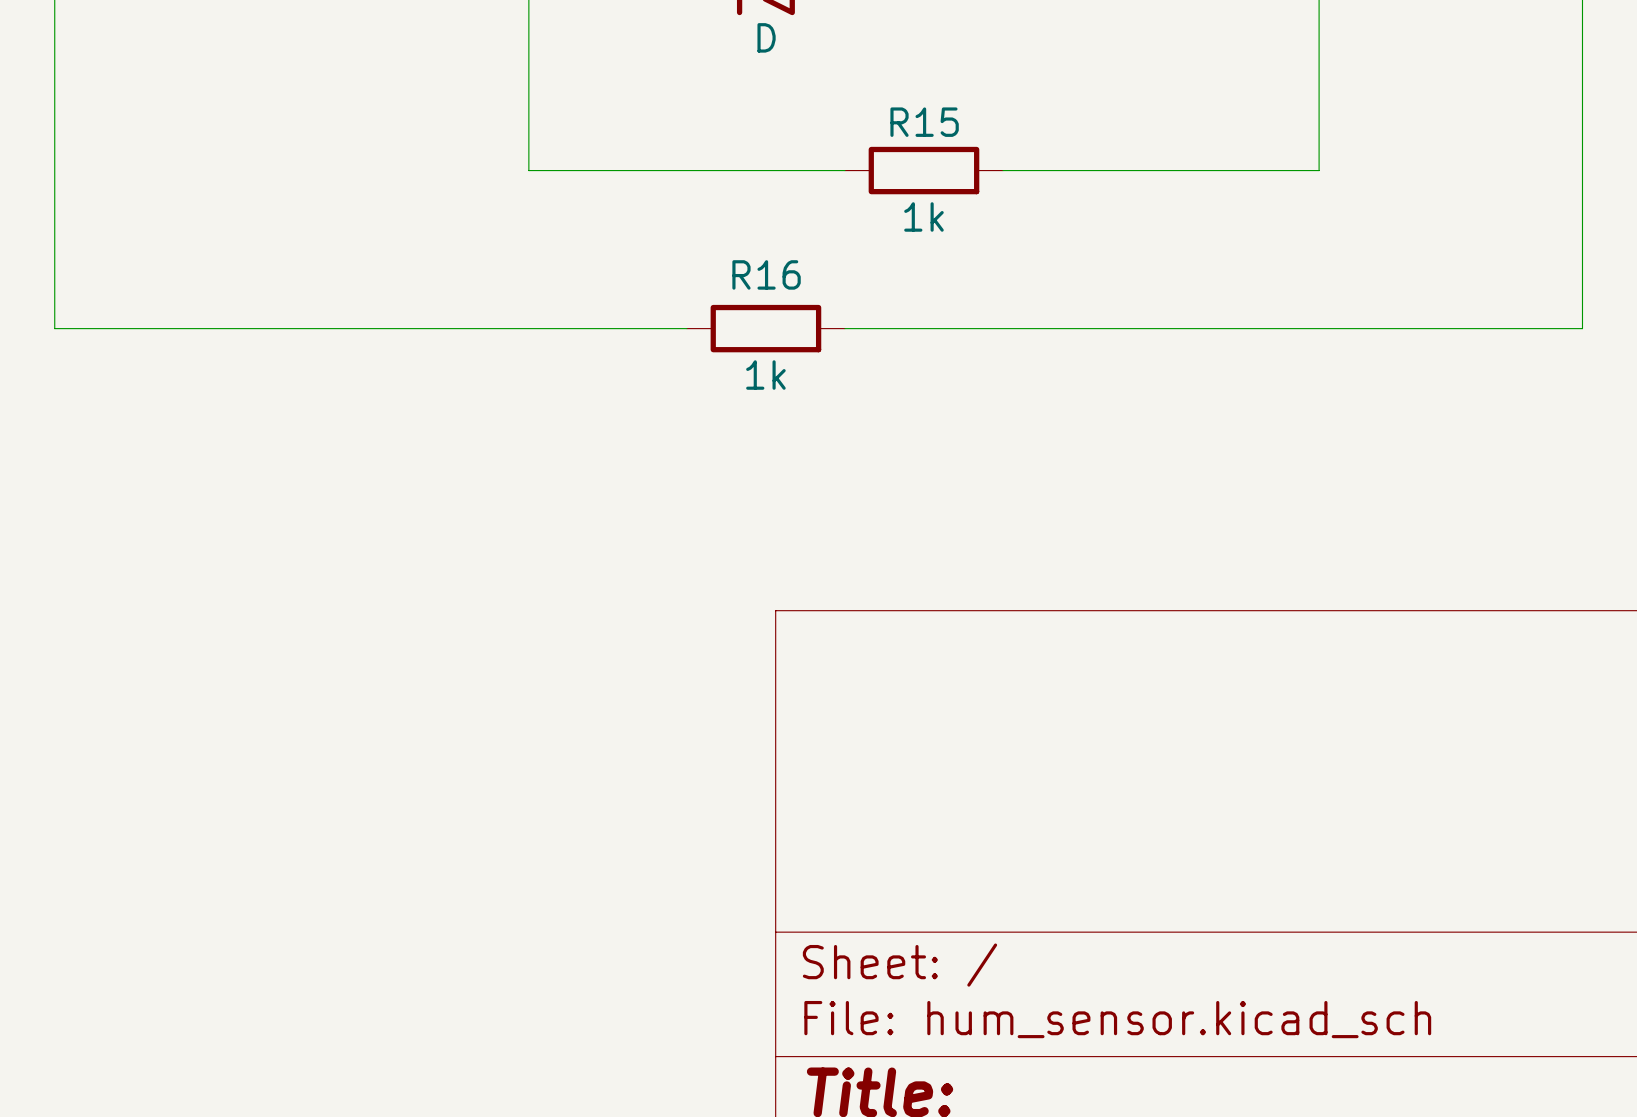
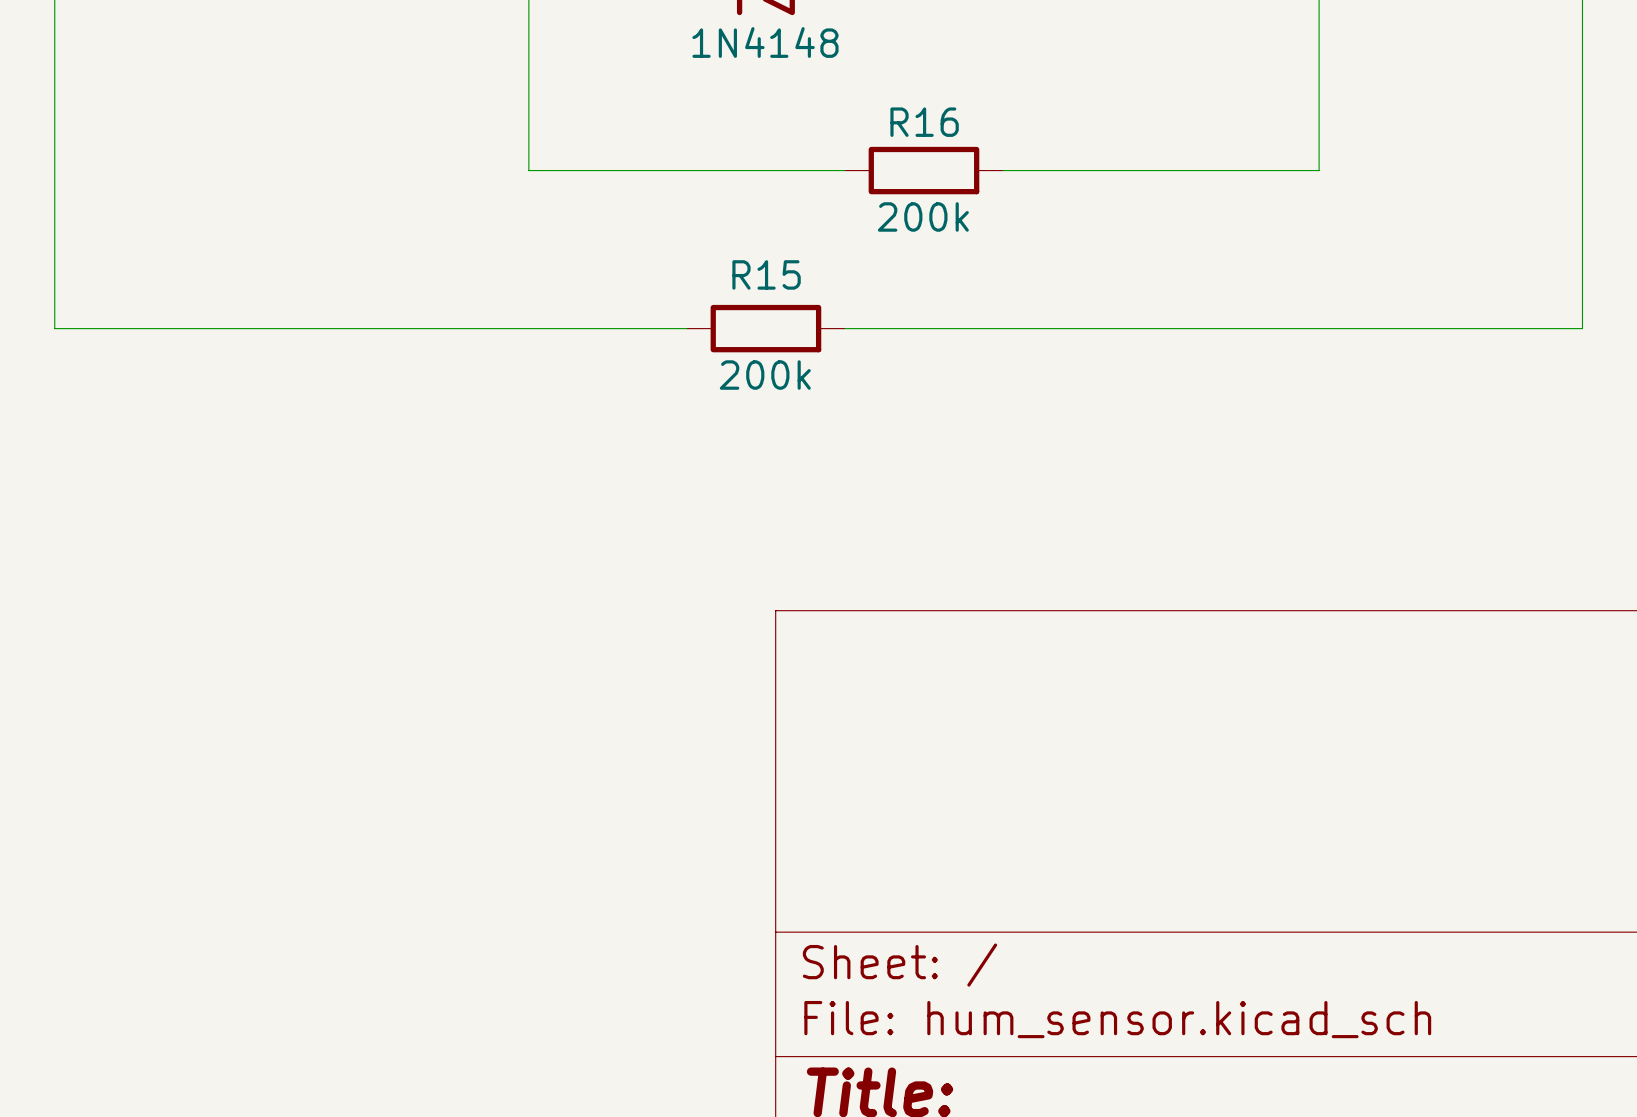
part value: D (766, 37) -> 1N4148 (765, 42)
R15 name: R15 (924, 122) -> R16 (924, 122)
R15 value: 1k (923, 216) -> 200k (923, 216)
R16 name: R16 (766, 274) -> R15 (766, 274)
R16 value: 1k (765, 375) -> 200k (765, 375)

